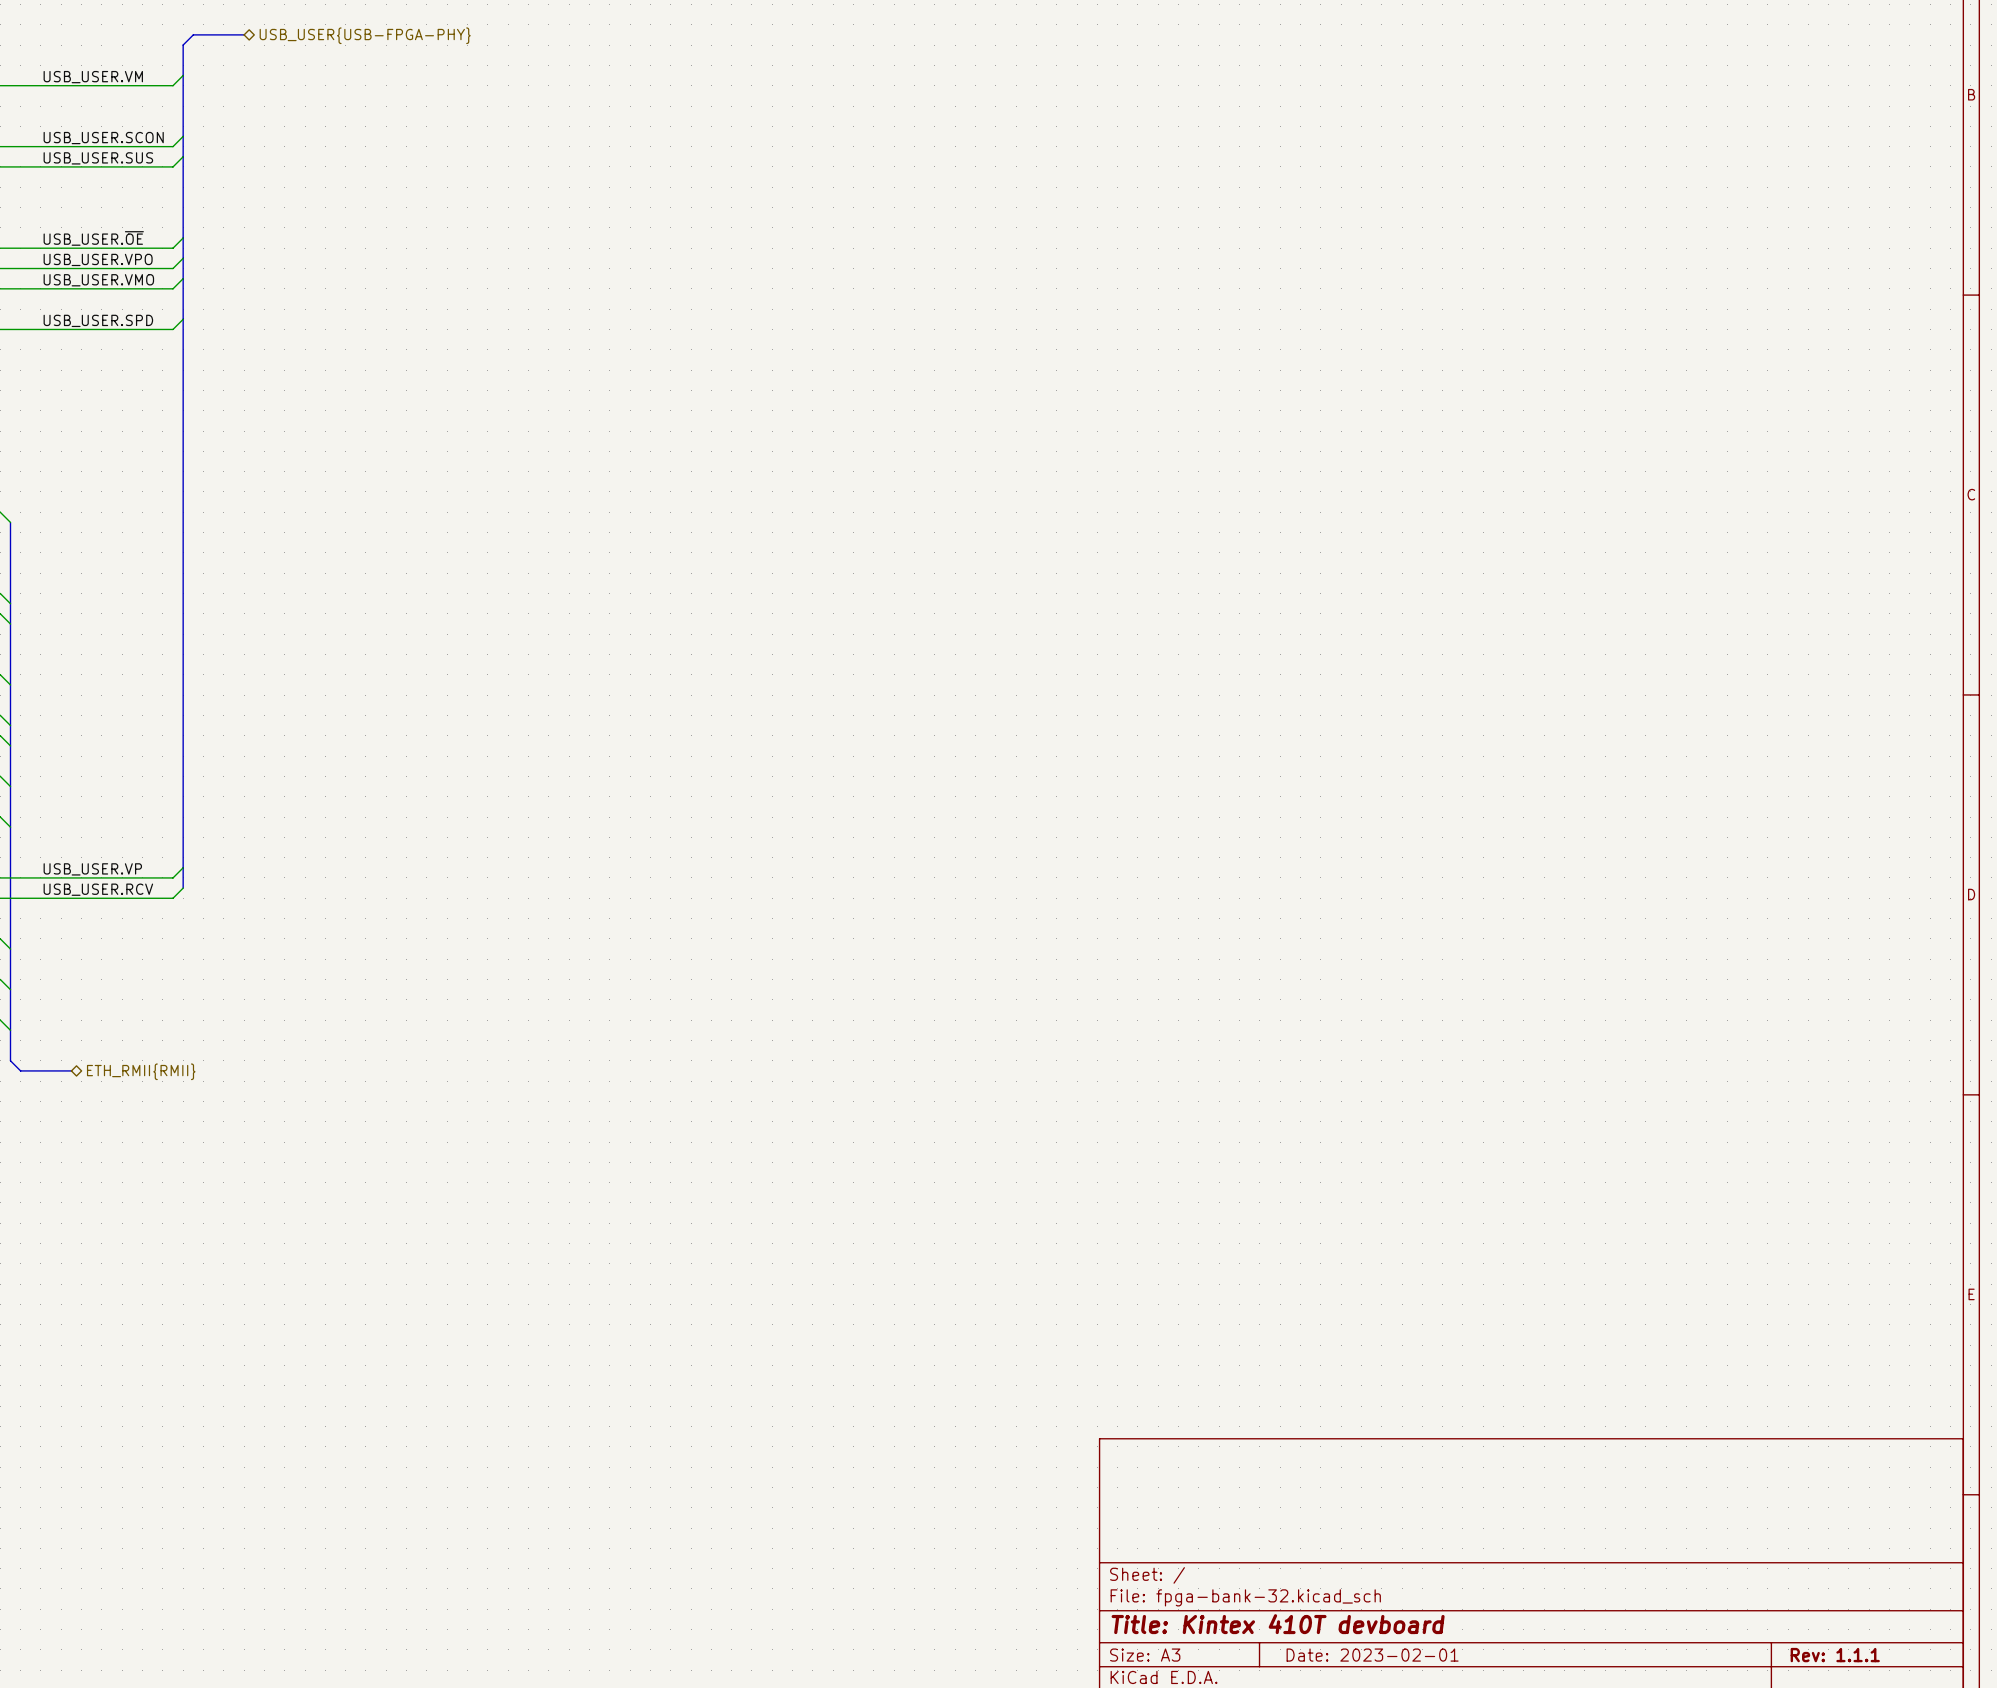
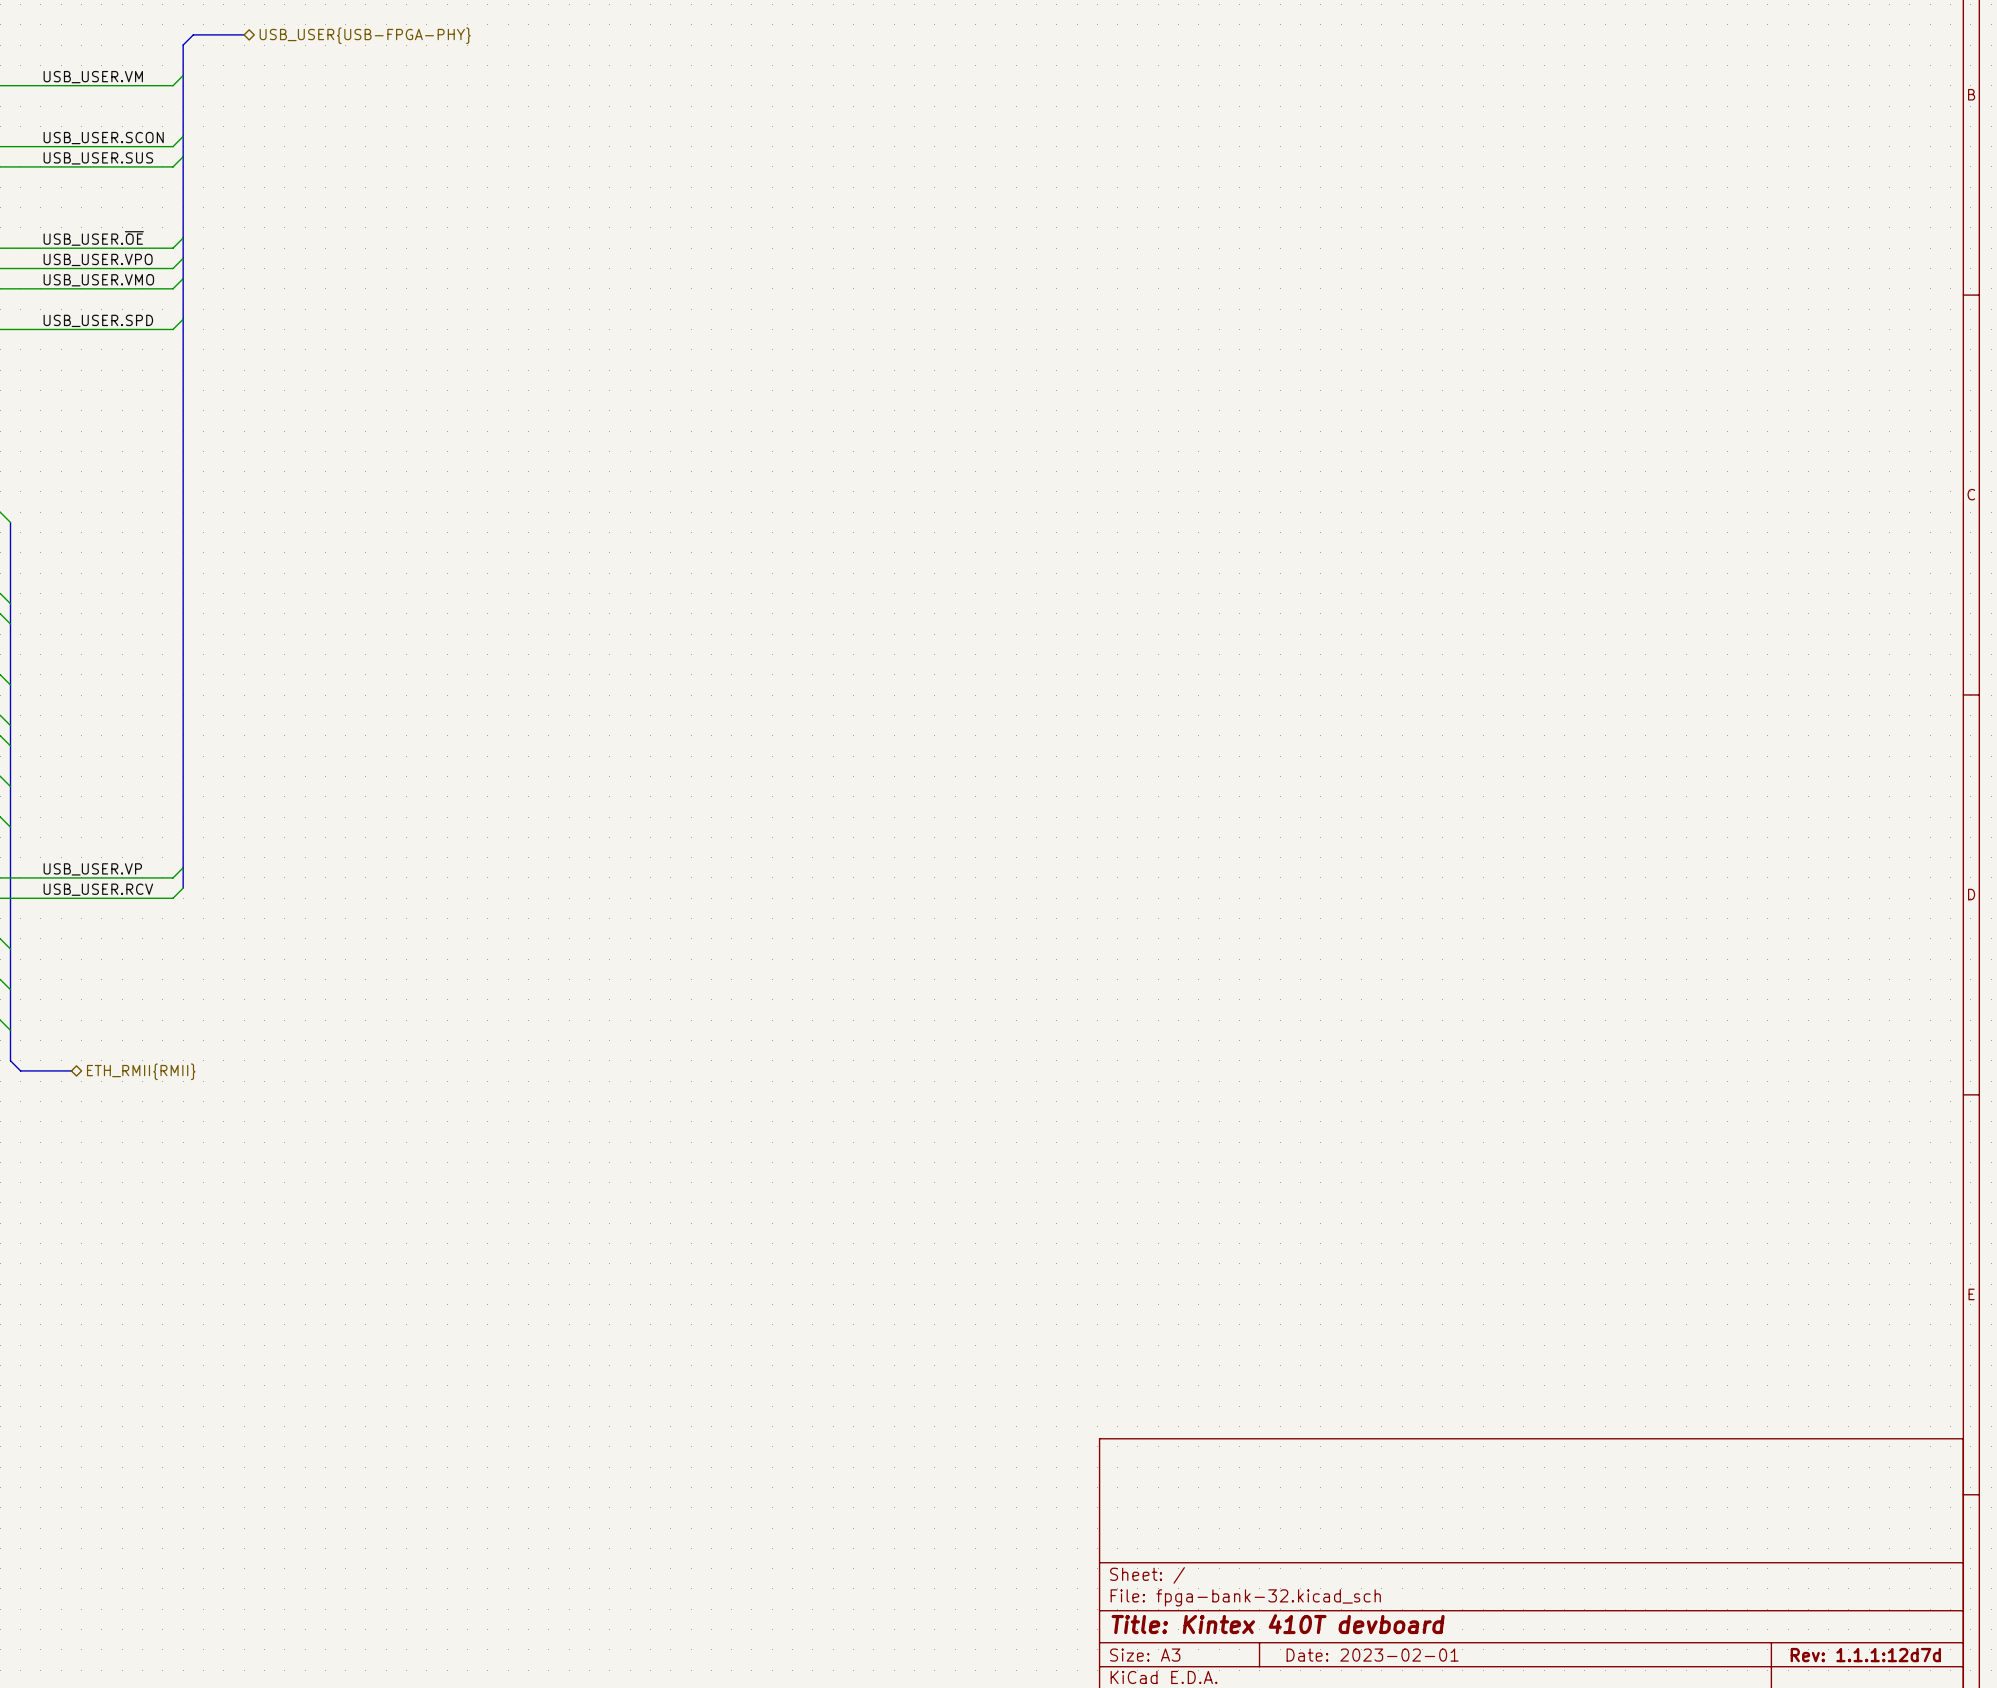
title block: Rev: 1.1.1 (1835, 1655) -> Rev: 1.1.1:12d7d (1865, 1655)

